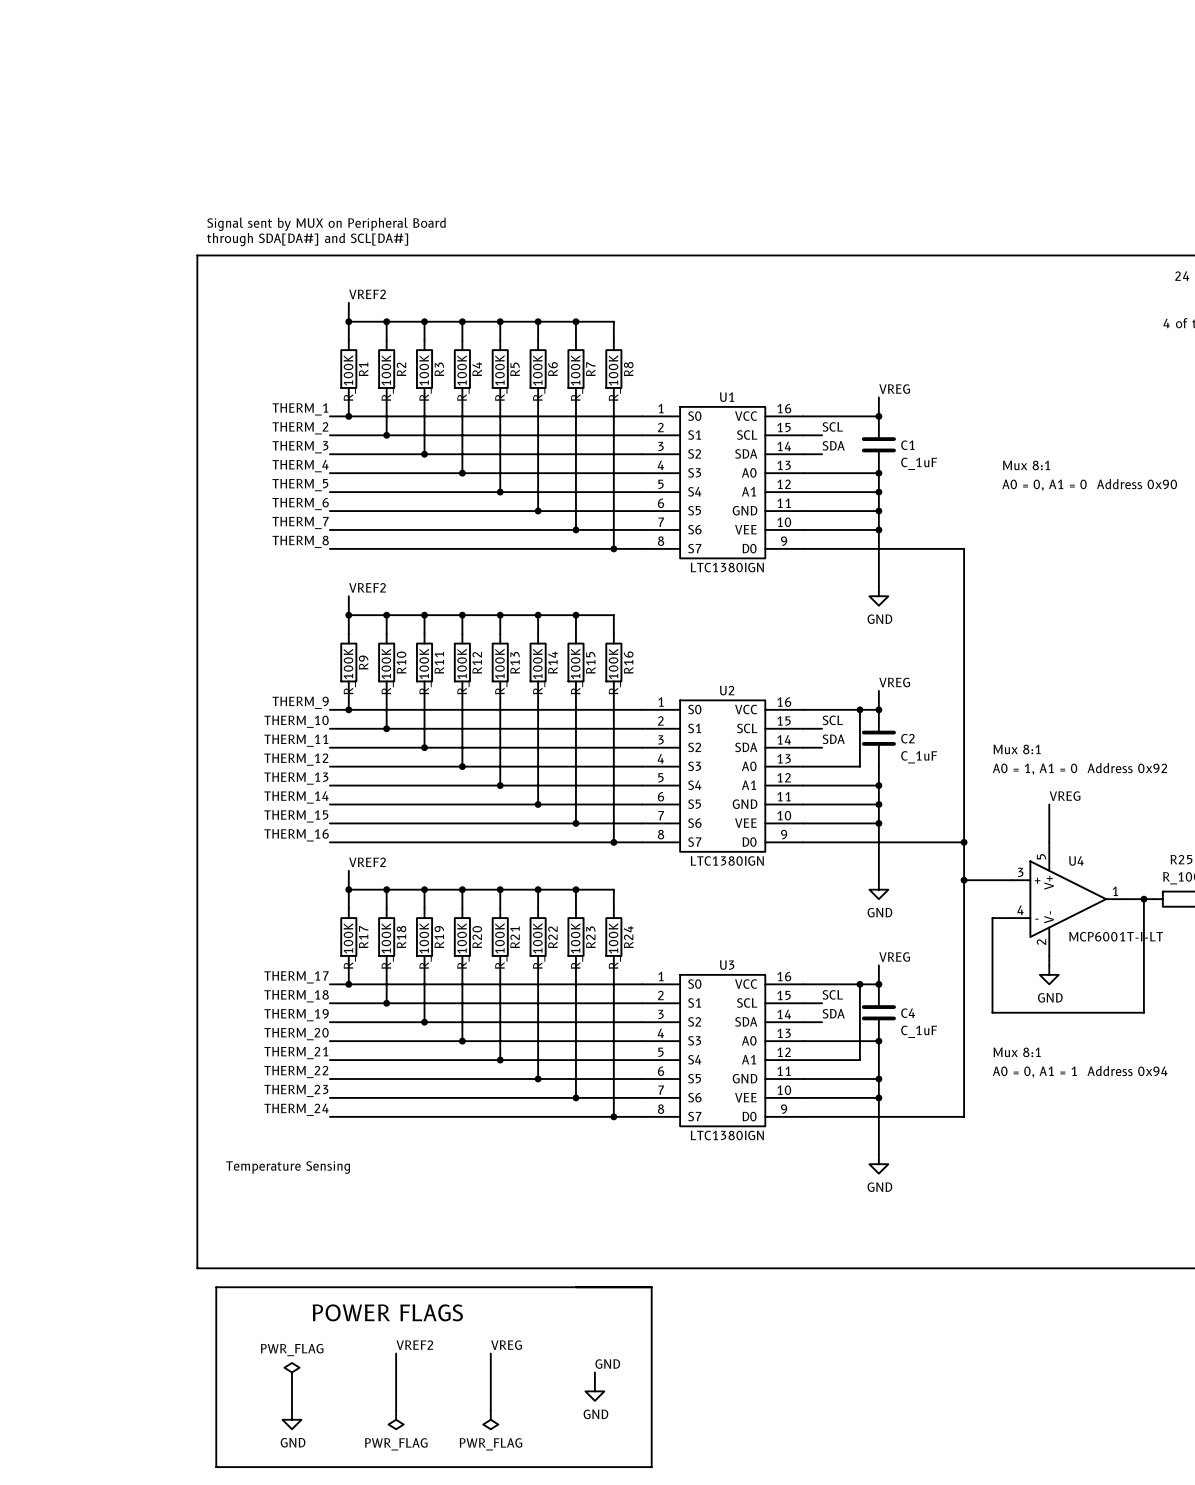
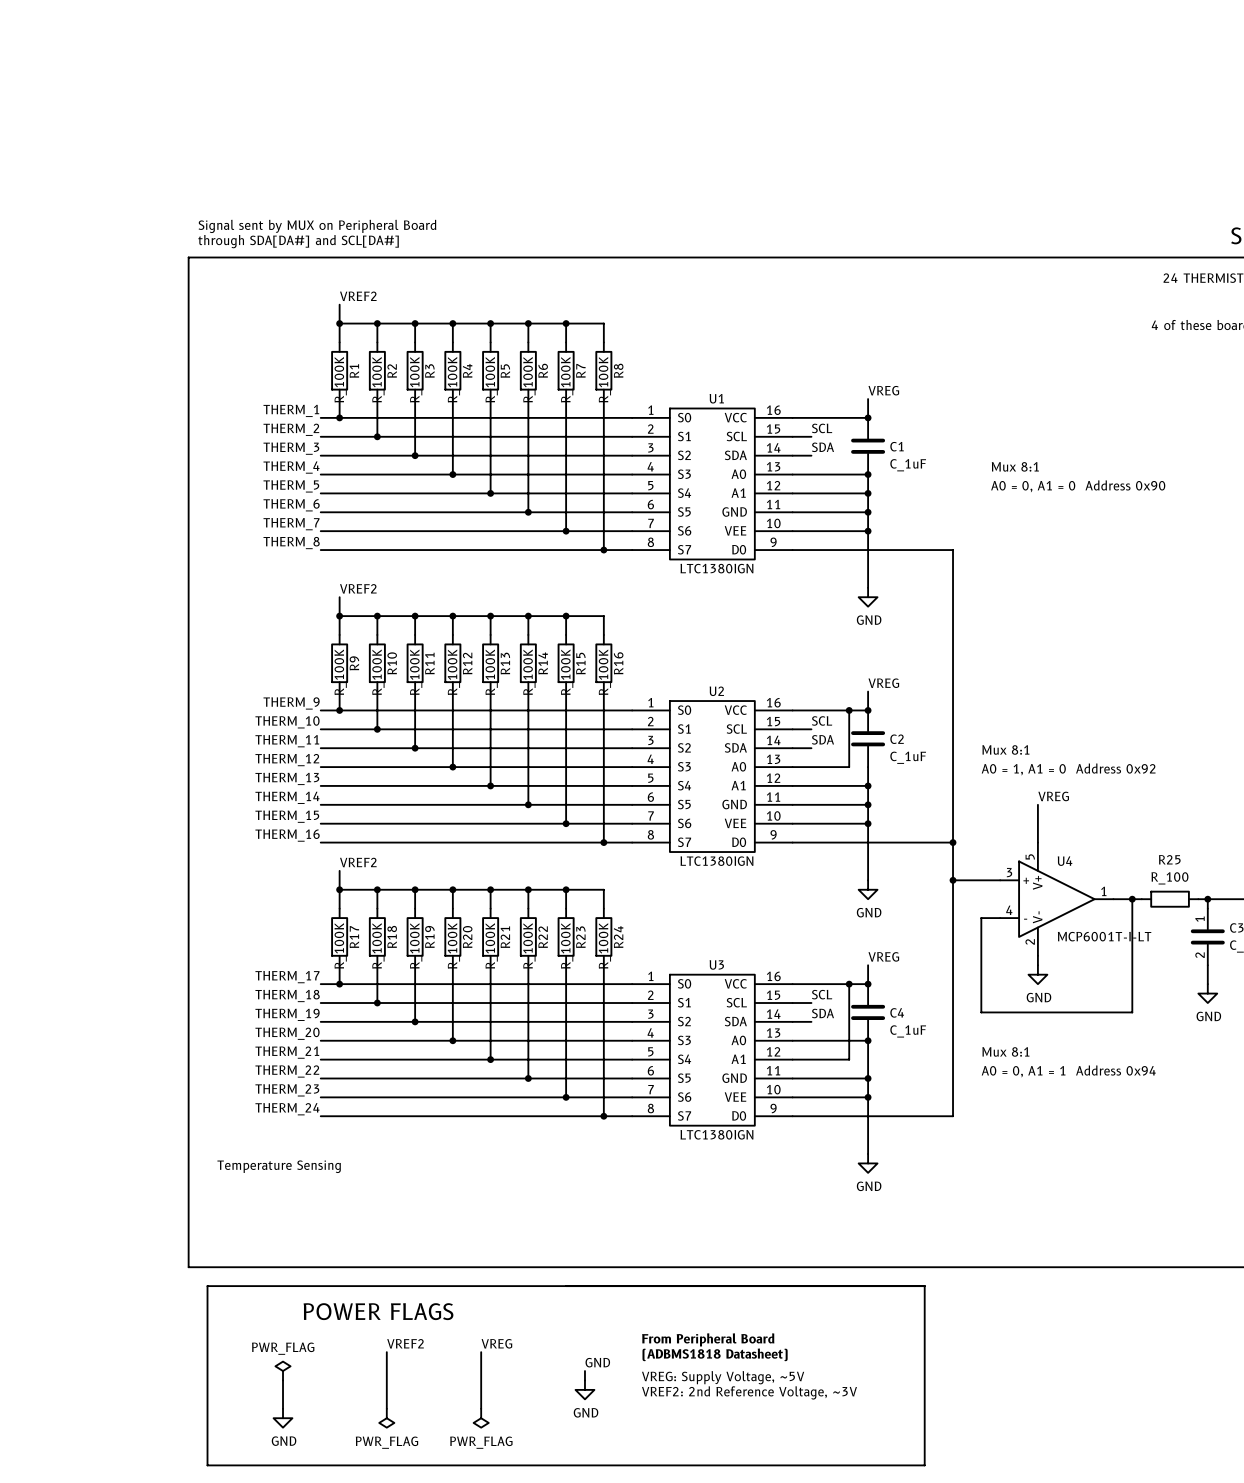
line: (651, 1287) (651, 1467) -> (641, 1286) (924, 1286) (924, 1465) (641, 1465)
text: none -> From Peripheral Board (708, 1339)
text: none -> (ADBMS1818 Datasheet) (715, 1354)
text: none -> VREG: Supply Voltage, ~5V (723, 1377)
text: none -> VREF2: 2nd Reference Voltage, ~3V (749, 1392)

